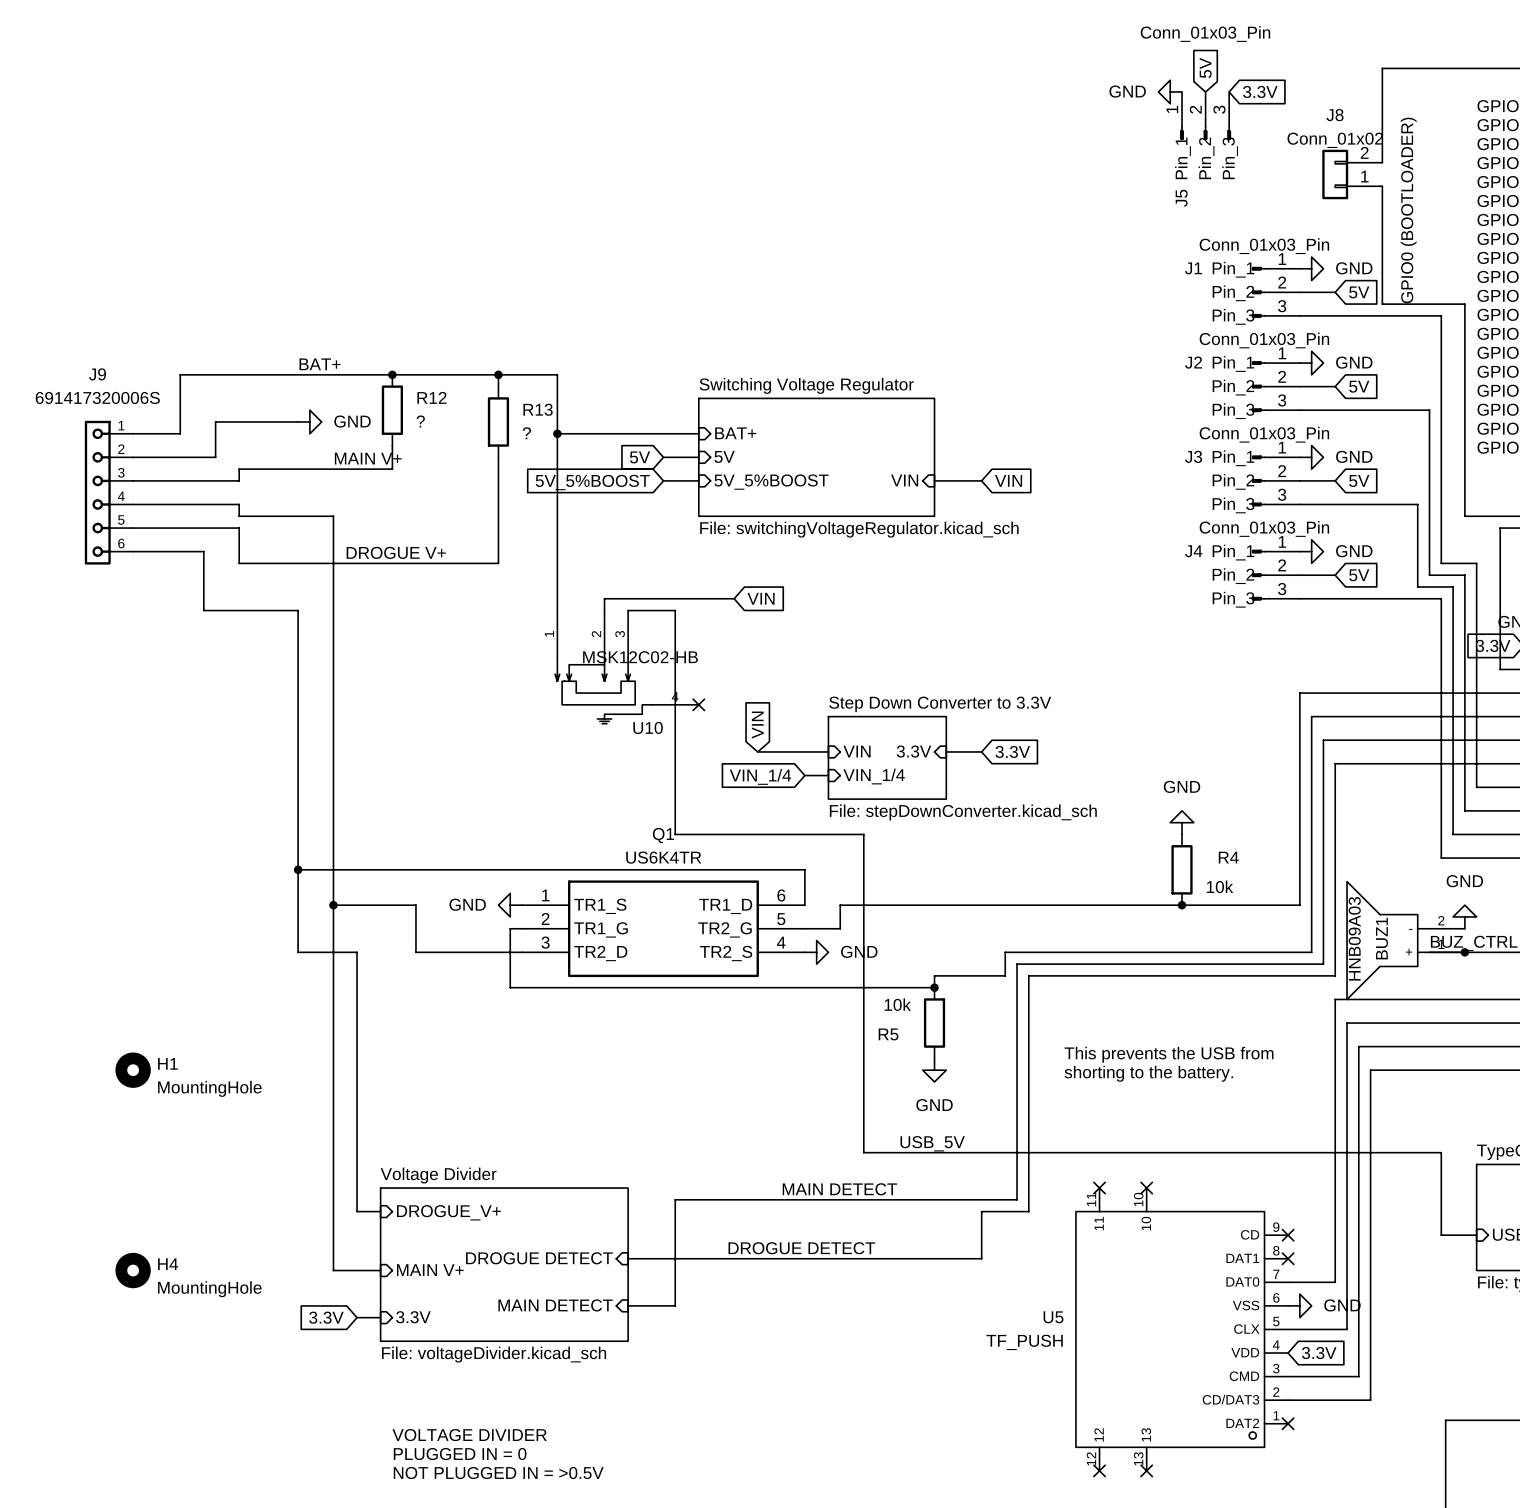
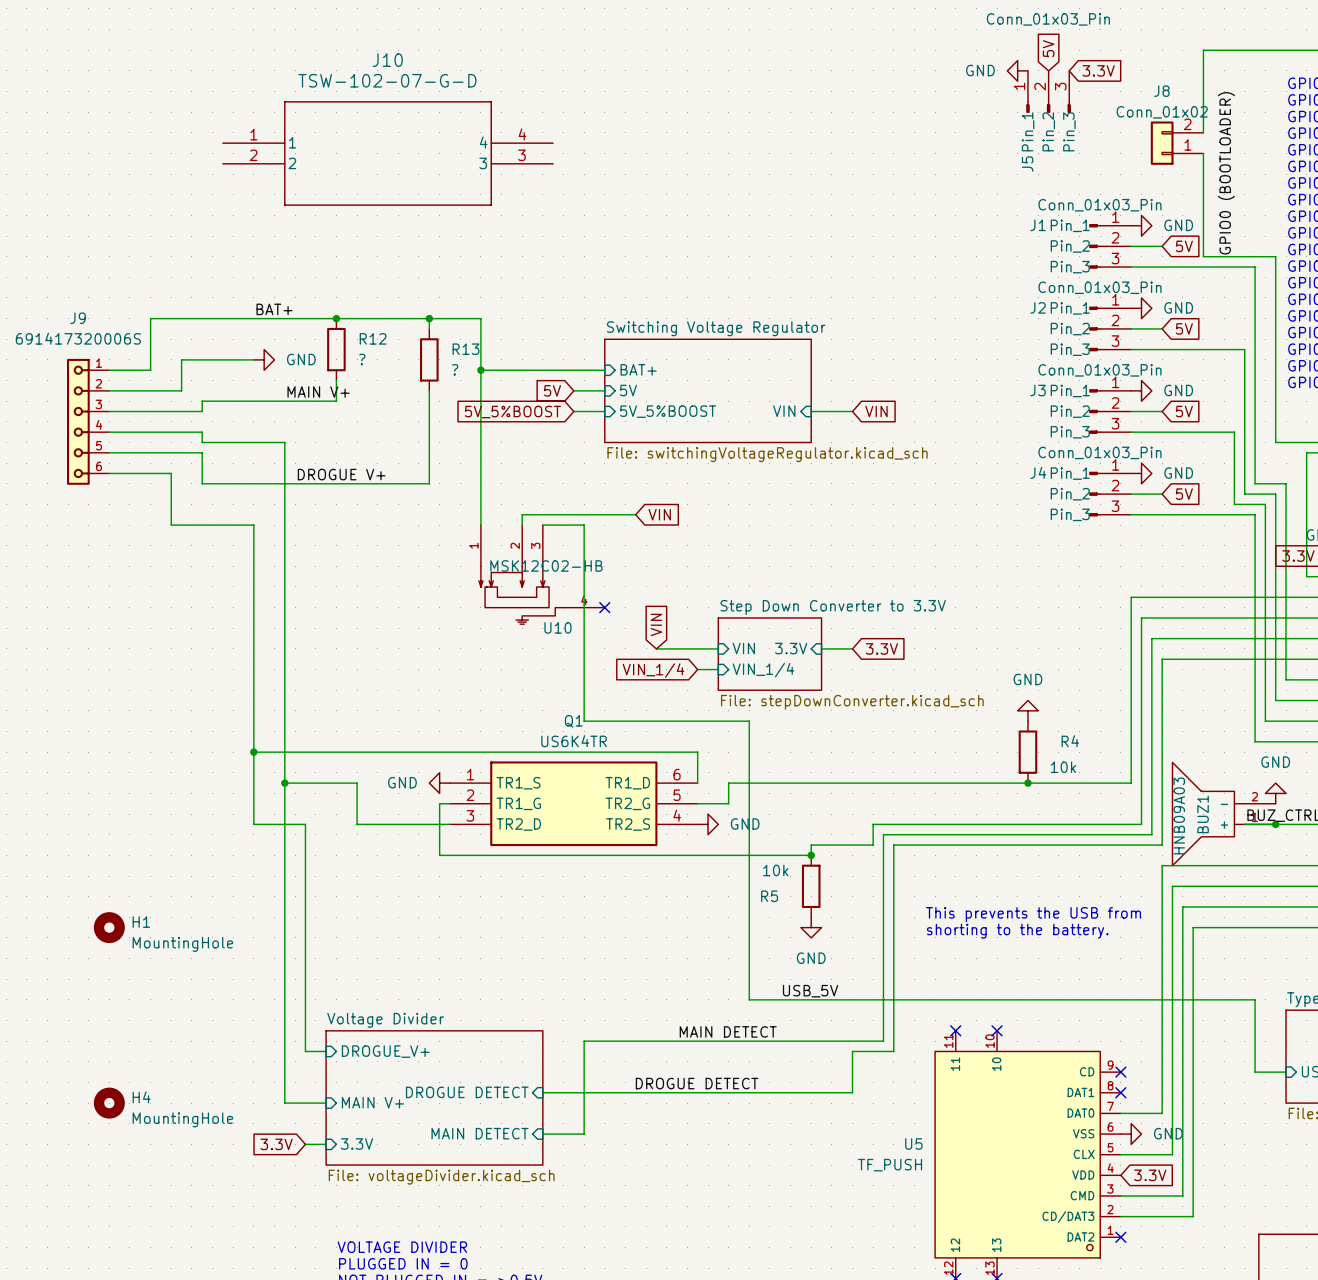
J10: none -> TSW-102-07-G-D (388, 153)

